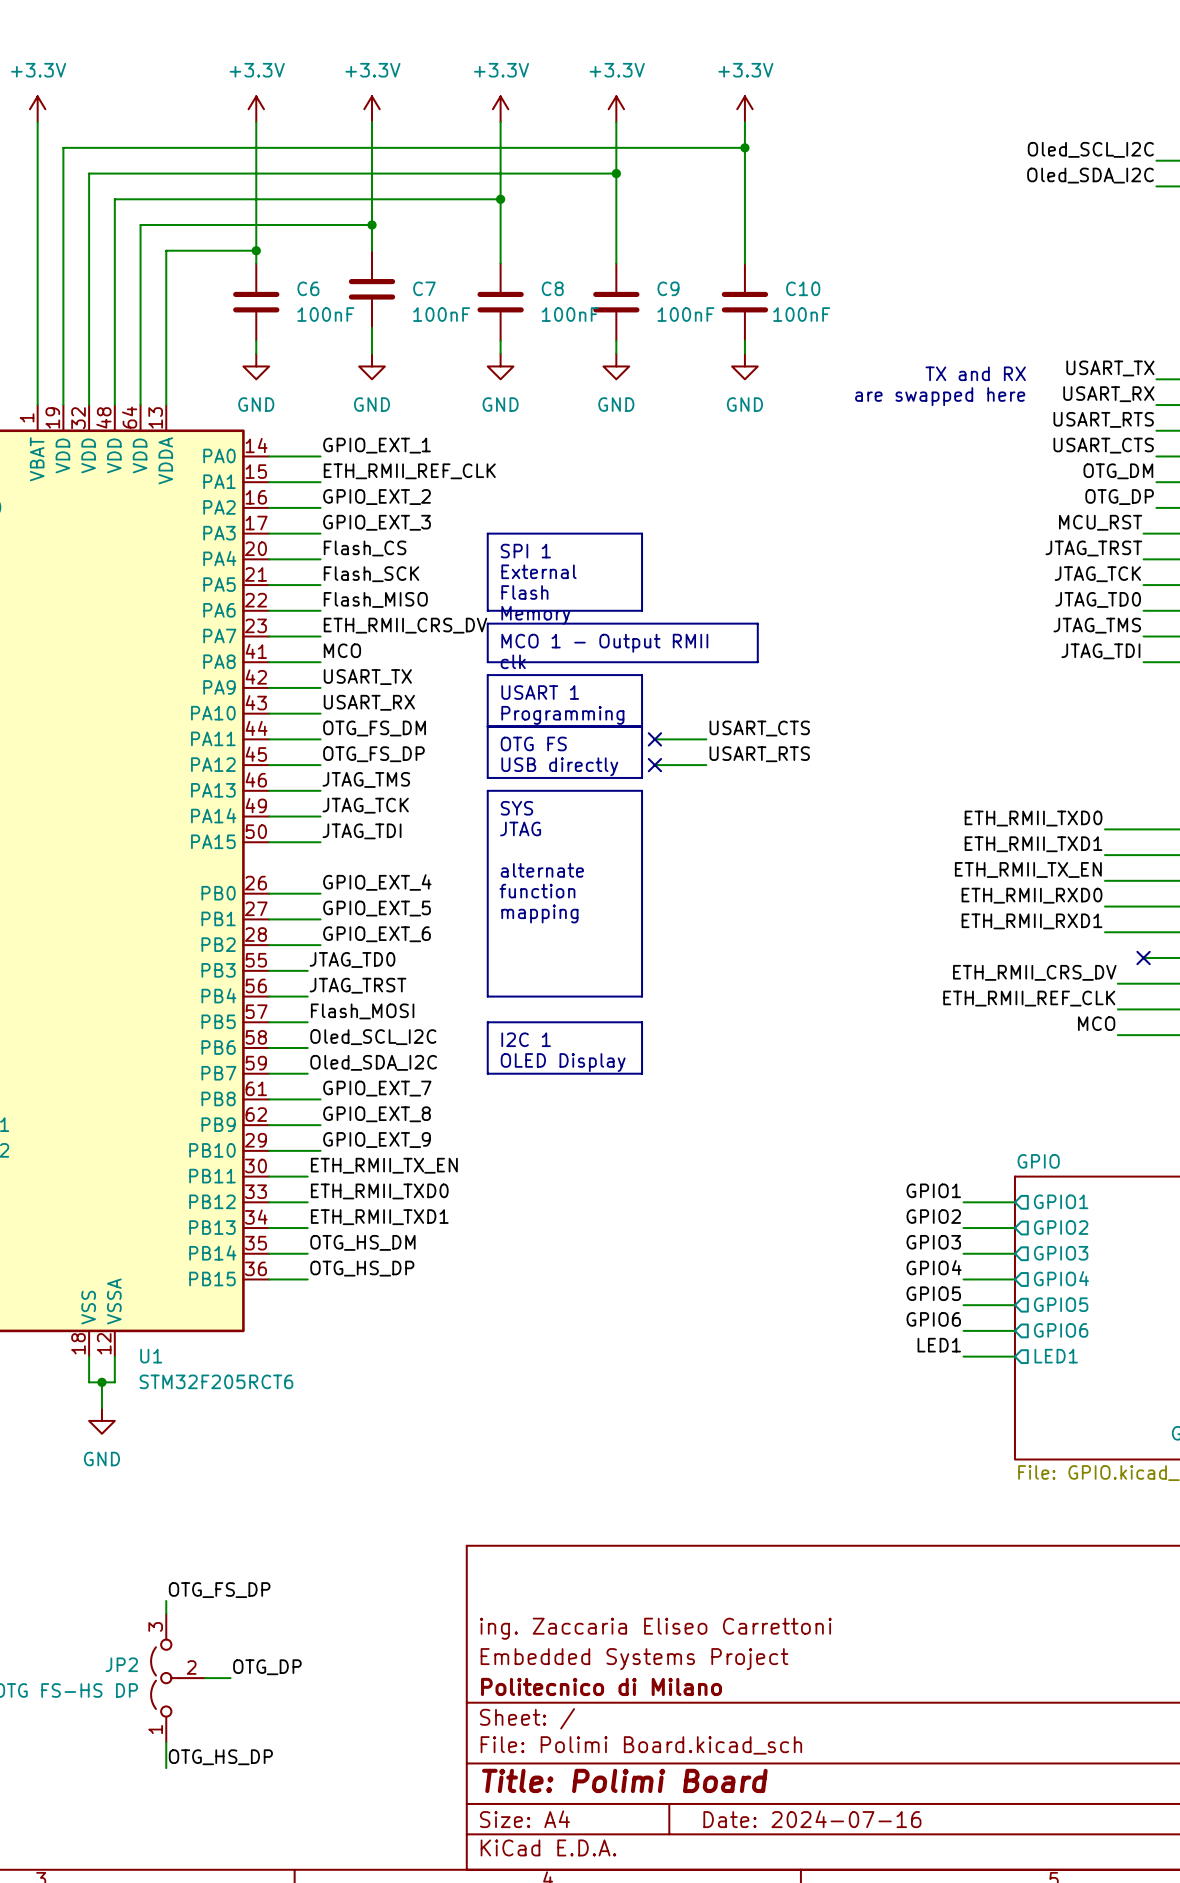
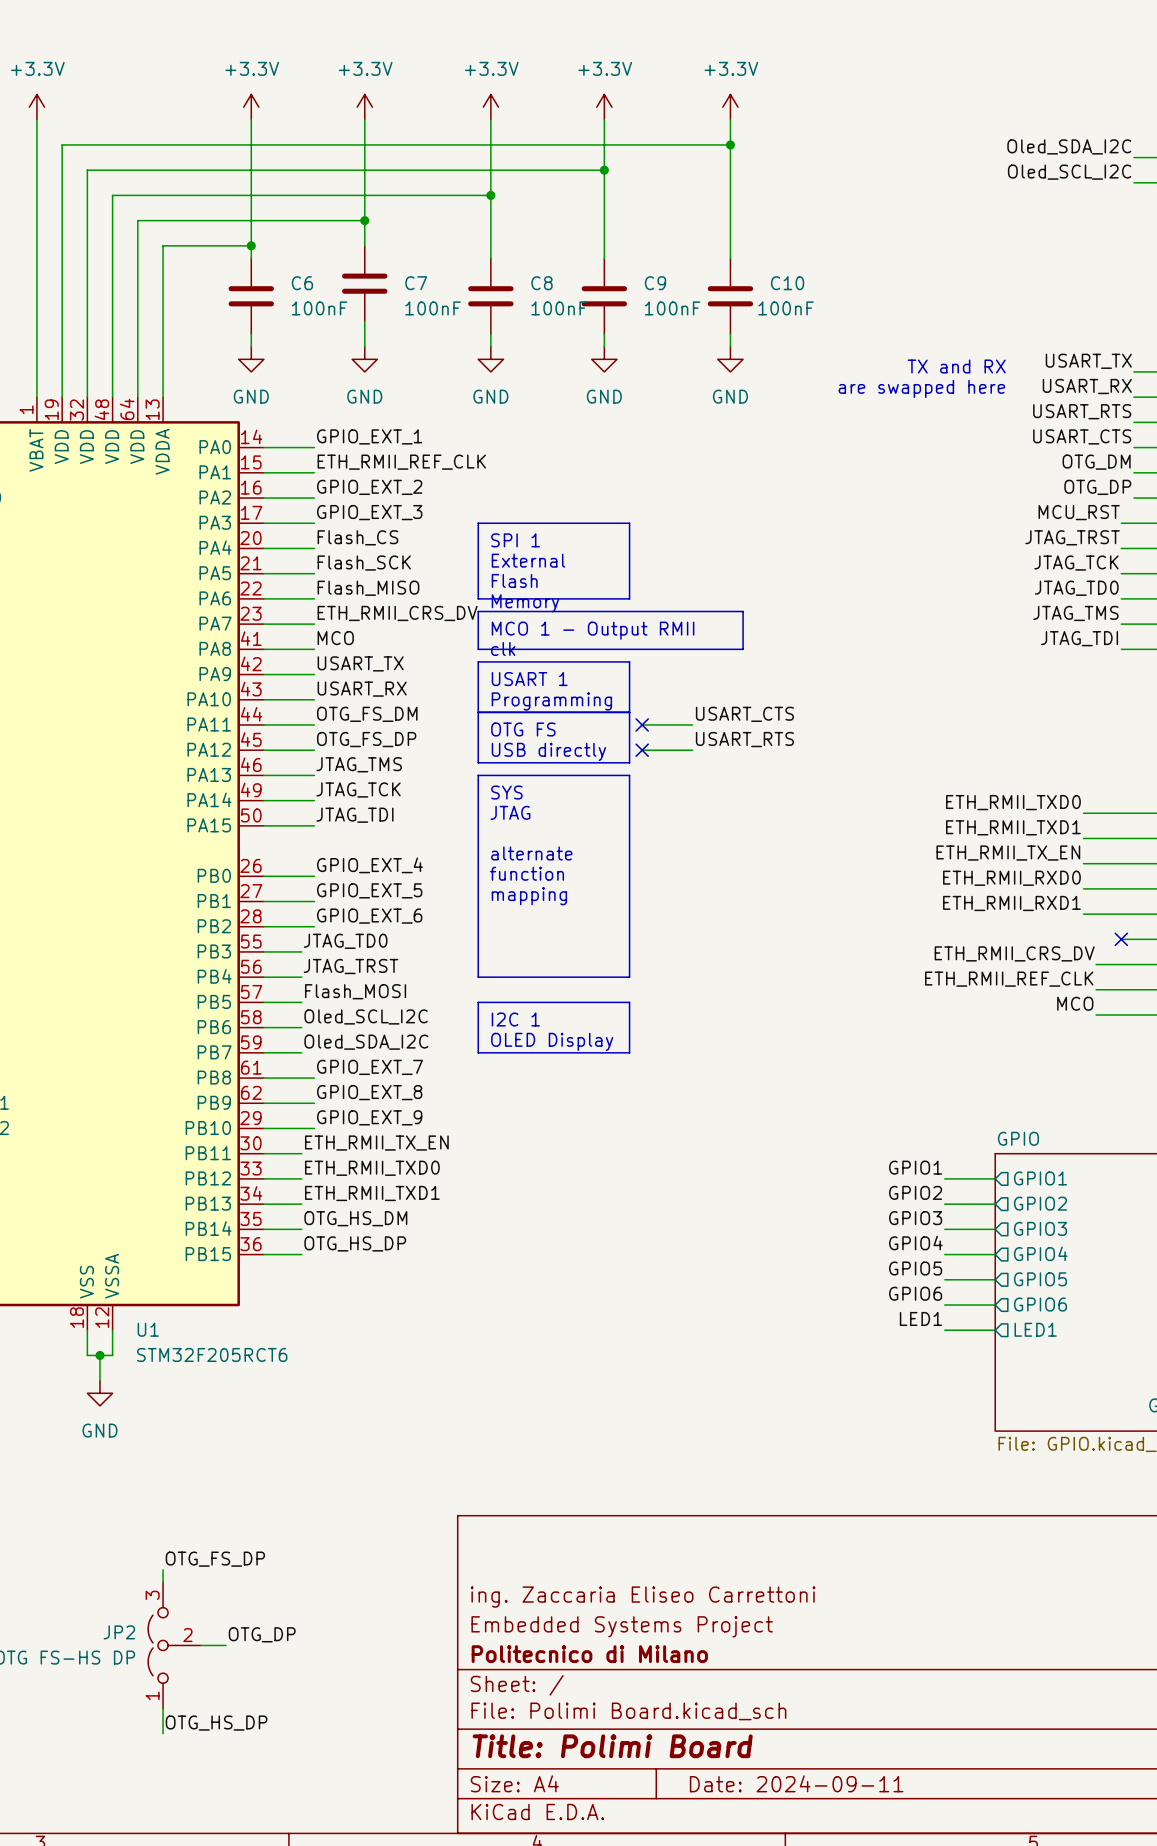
label: Oled_SCL_I2C (1090, 149) -> Oled_SDA_I2C (1069, 146)
label: Oled_SDA_I2C (1090, 175) -> Oled_SCL_I2C (1069, 172)
title block: Date: 2024-07-16 (812, 1819) -> Date: 2024-09-11 (796, 1783)

